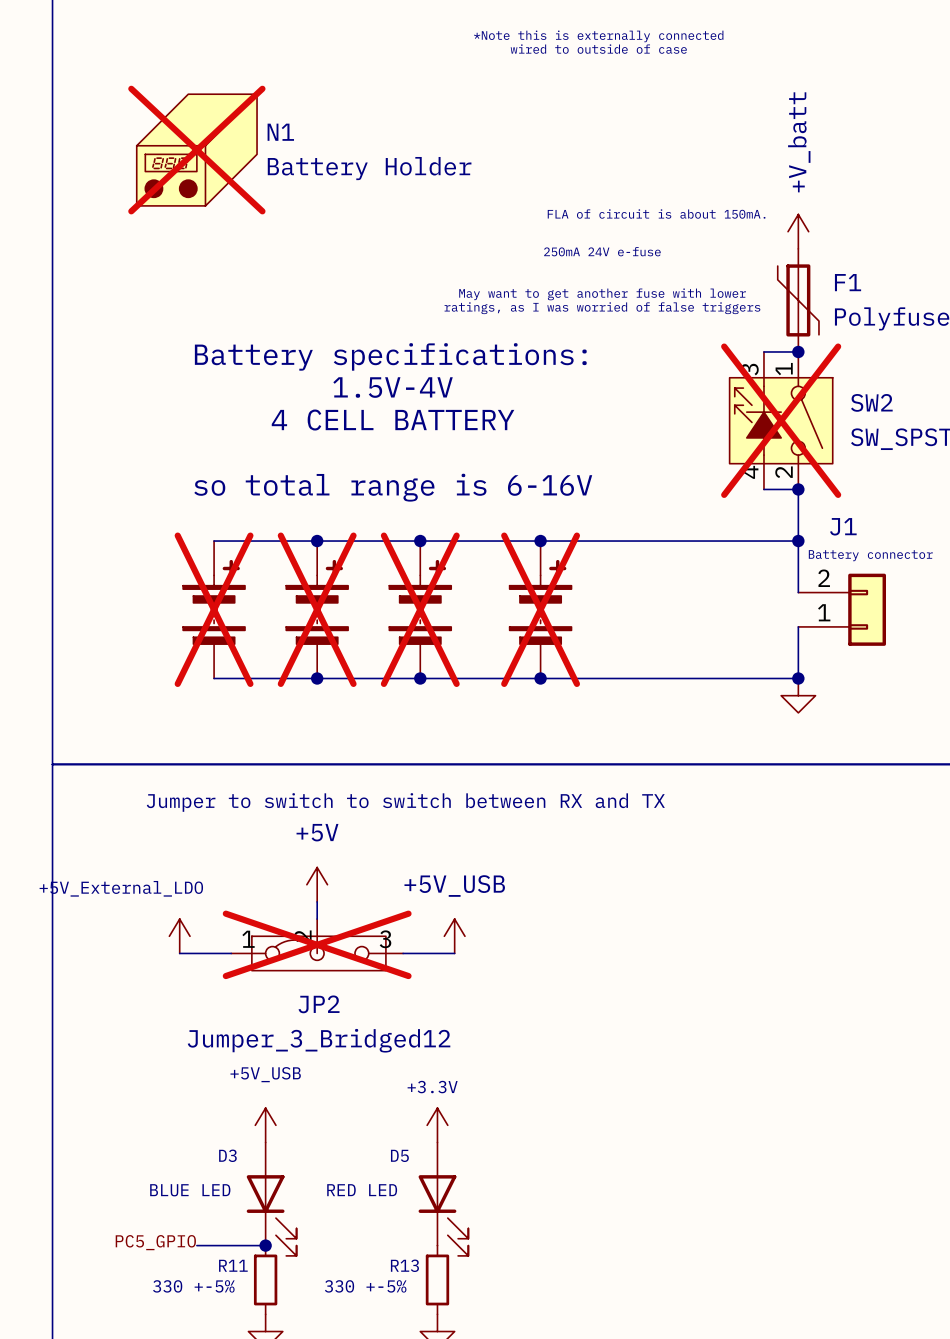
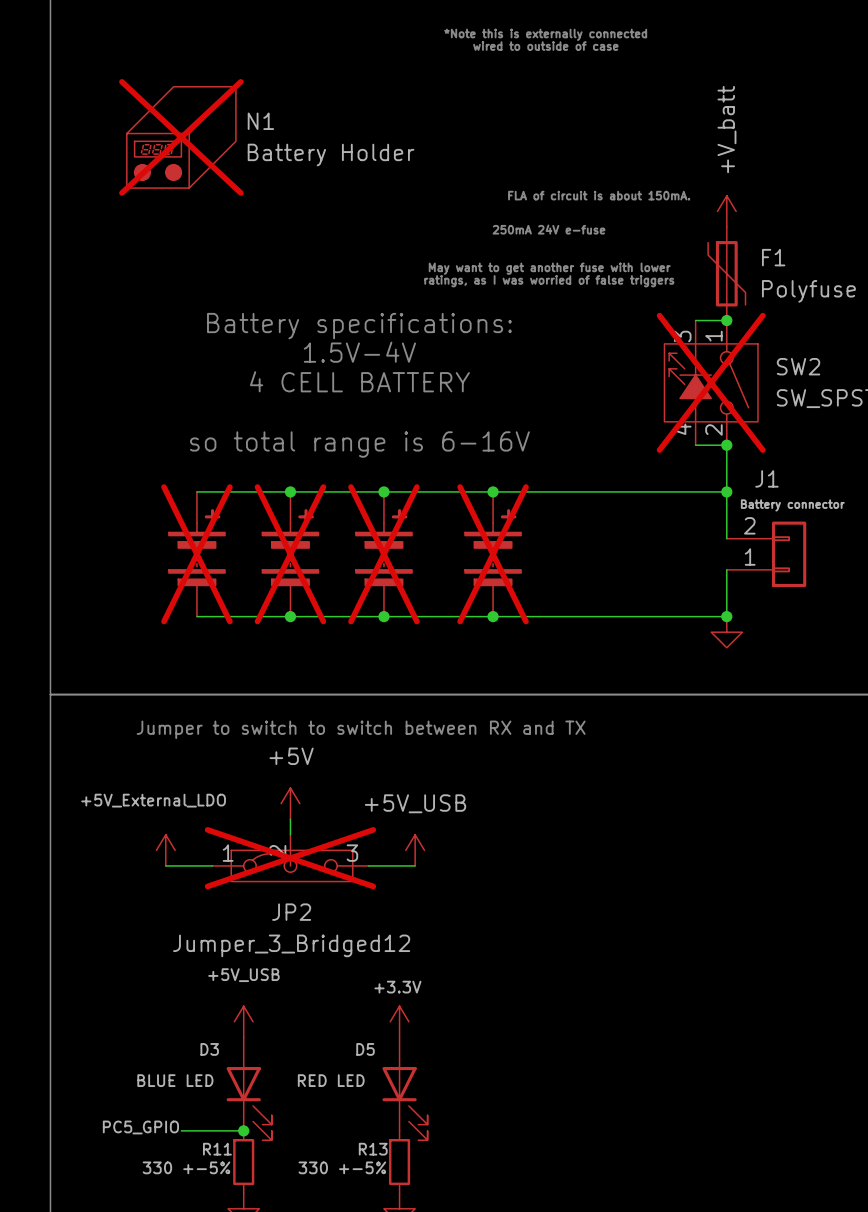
power symbol text position: +5V_External_LDO (121, 888) -> +5V_External_LDO (153, 800)

